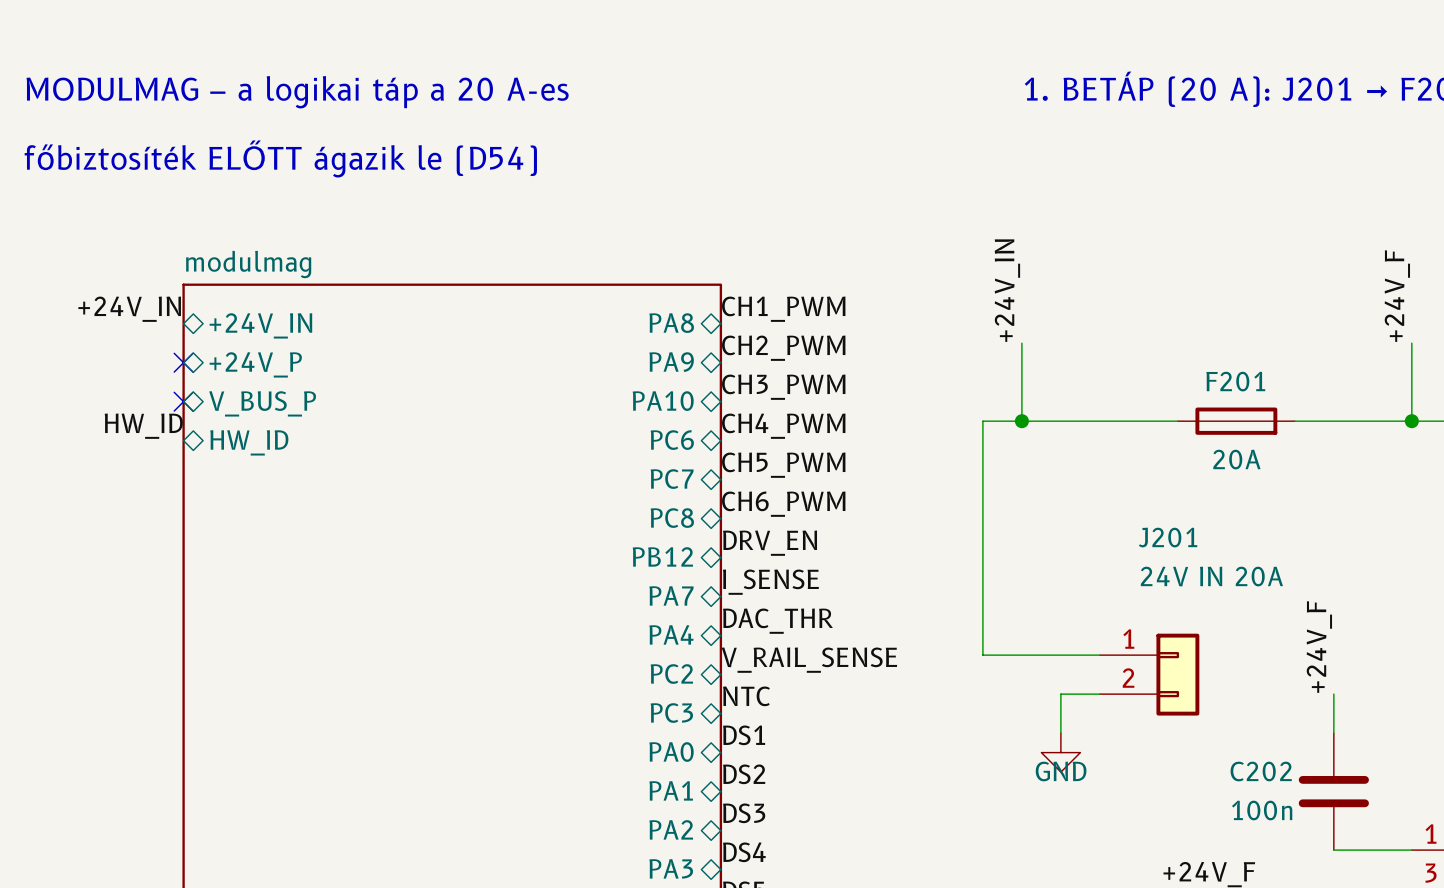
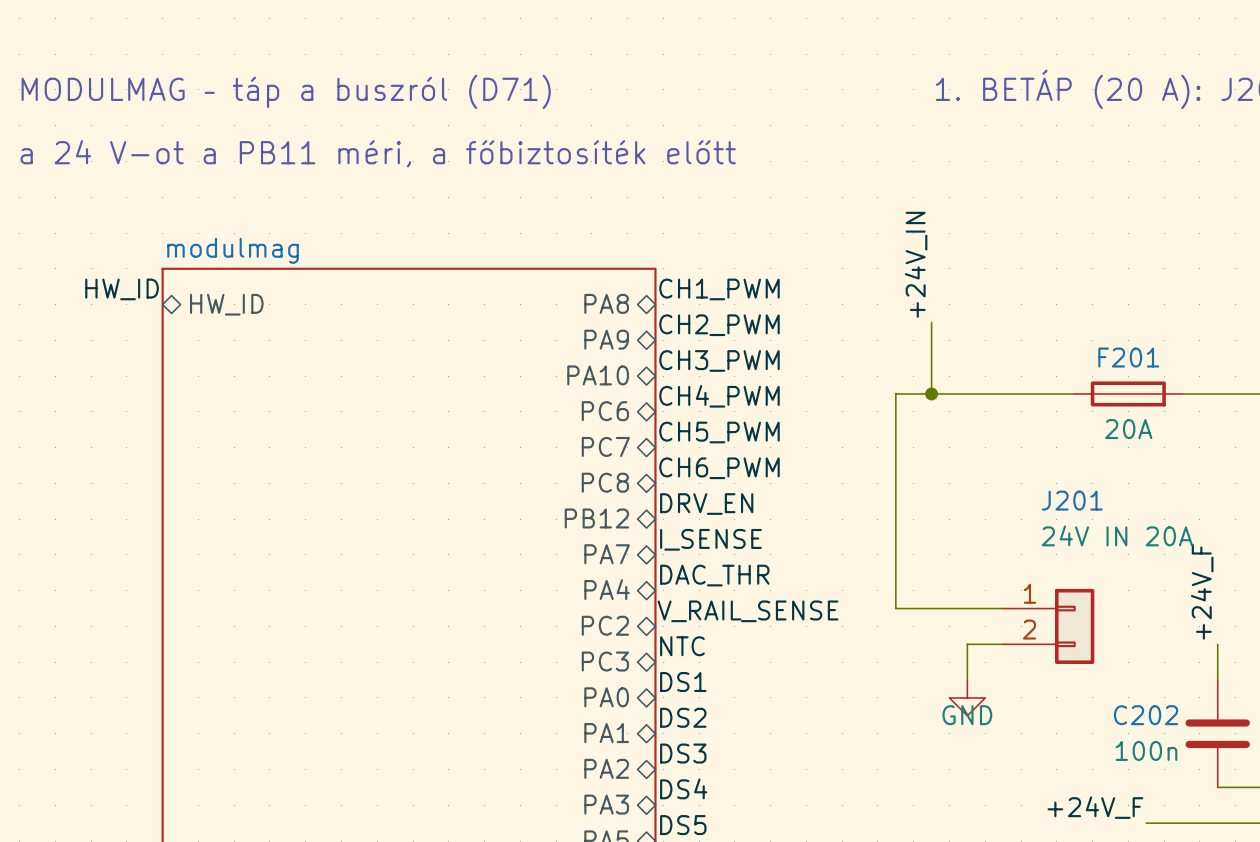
text: MODULMAG – a logikai táp a 20 A-es (297, 92) -> MODULMAG – táp a buszról (D71) (286, 91)
text: főbiztosíték ELŐTT ágazik le (D54) (280, 158) -> a 24 V-ot a PB11 méri, a főbiztosíték előtt (378, 153)
label: +24V_IN (129, 309) -> HW_ID (122, 289)
sheet pin: +24V_IN (260, 325) -> HW_ID (226, 304)
no-connect mark: (183, 362) -> none
sheet pin: +24V_P (255, 364) -> none
no-connect mark: (183, 401) -> none
sheet pin: V_BUS_P (262, 403) -> none
label: HW_ID (143, 426) -> none
sheet pin: HW_ID (249, 442) -> none

